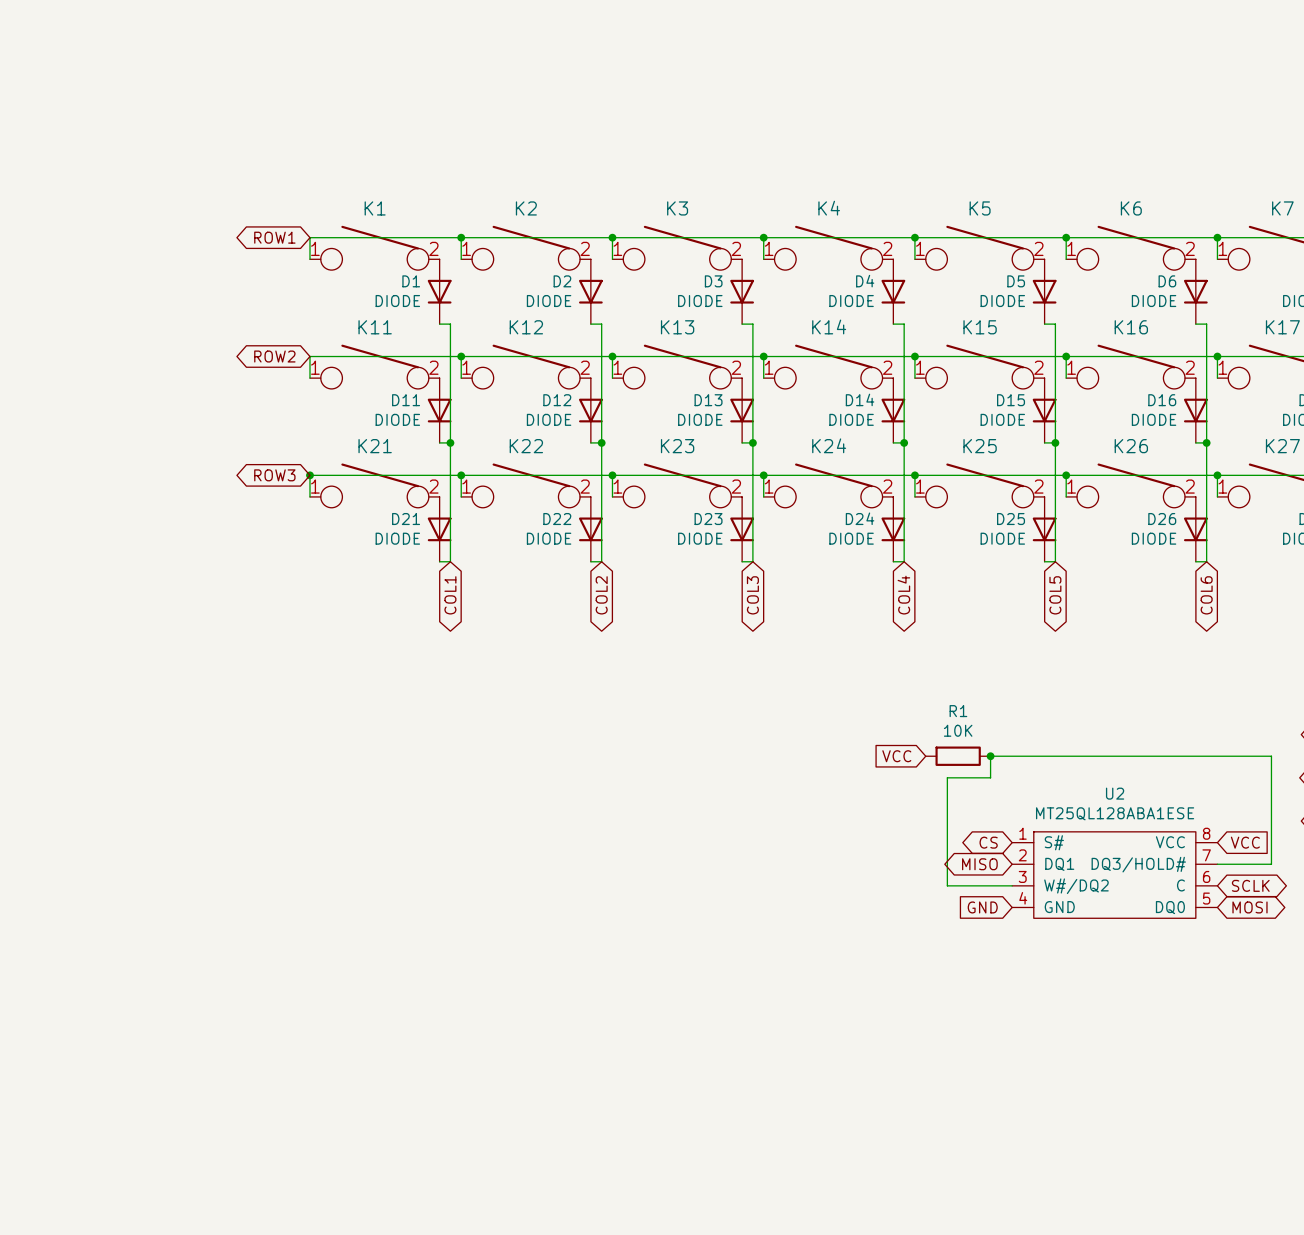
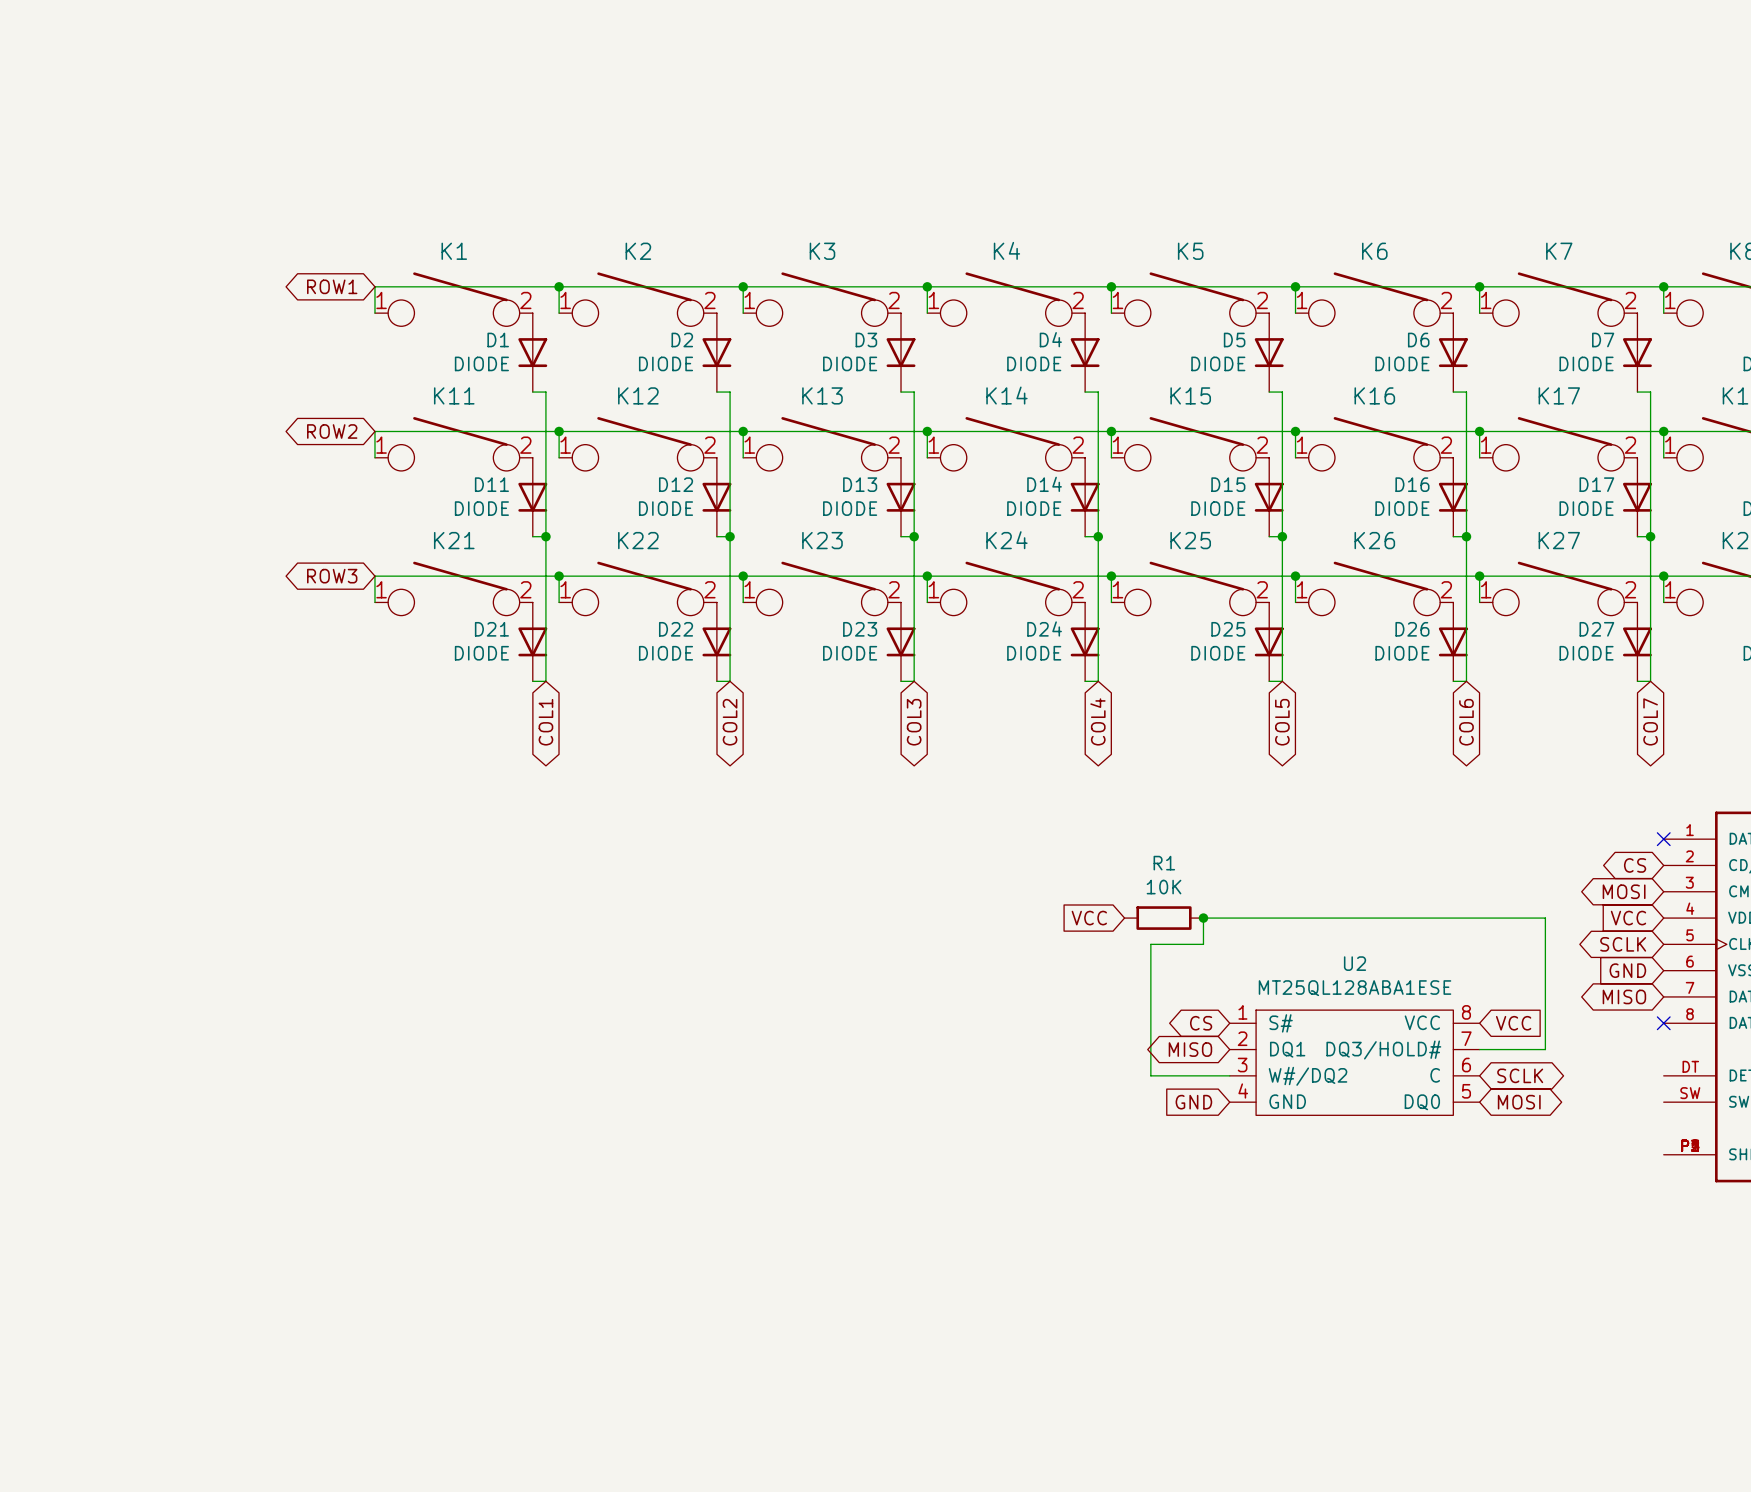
junction: (309, 475) -> none

